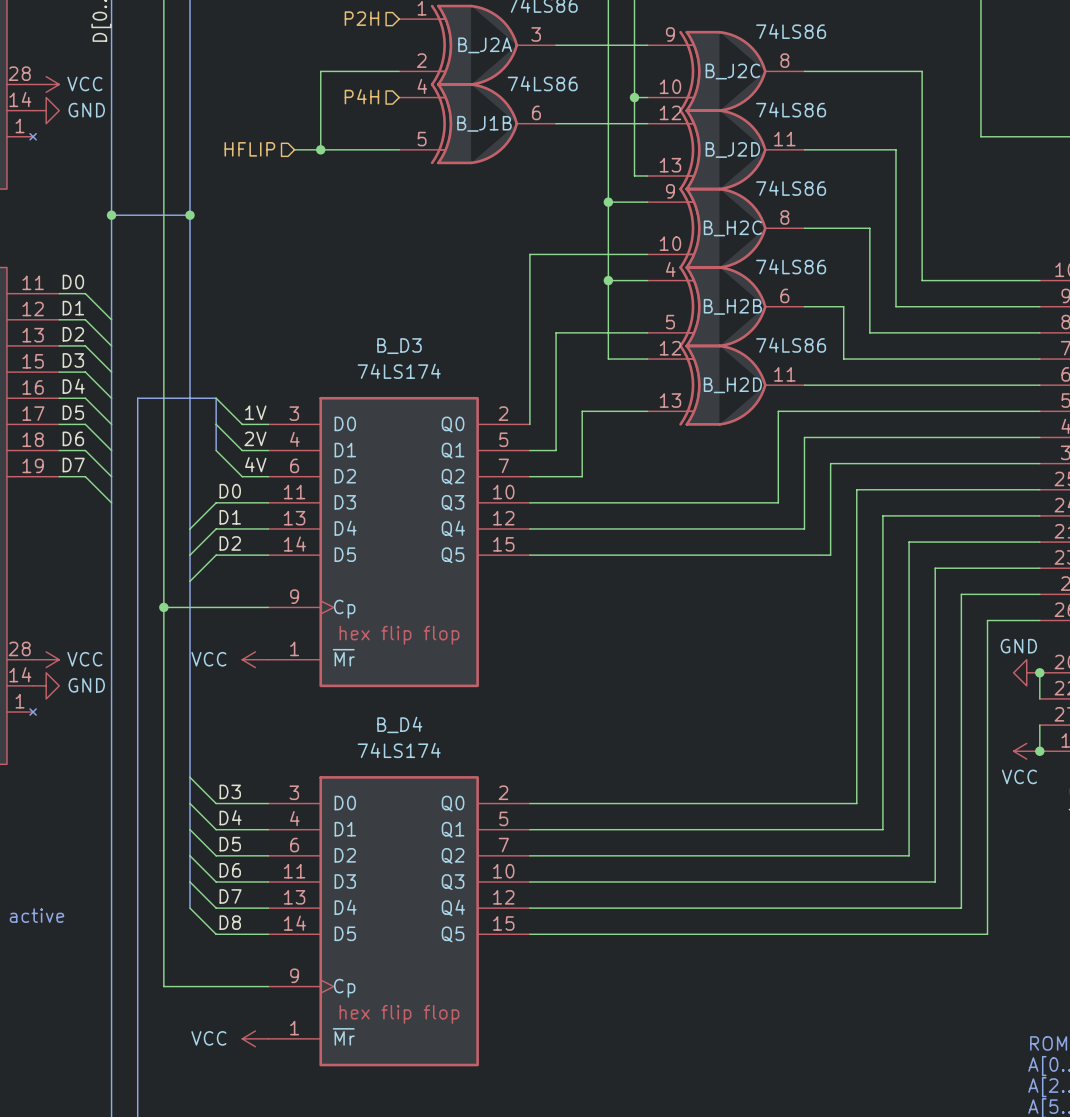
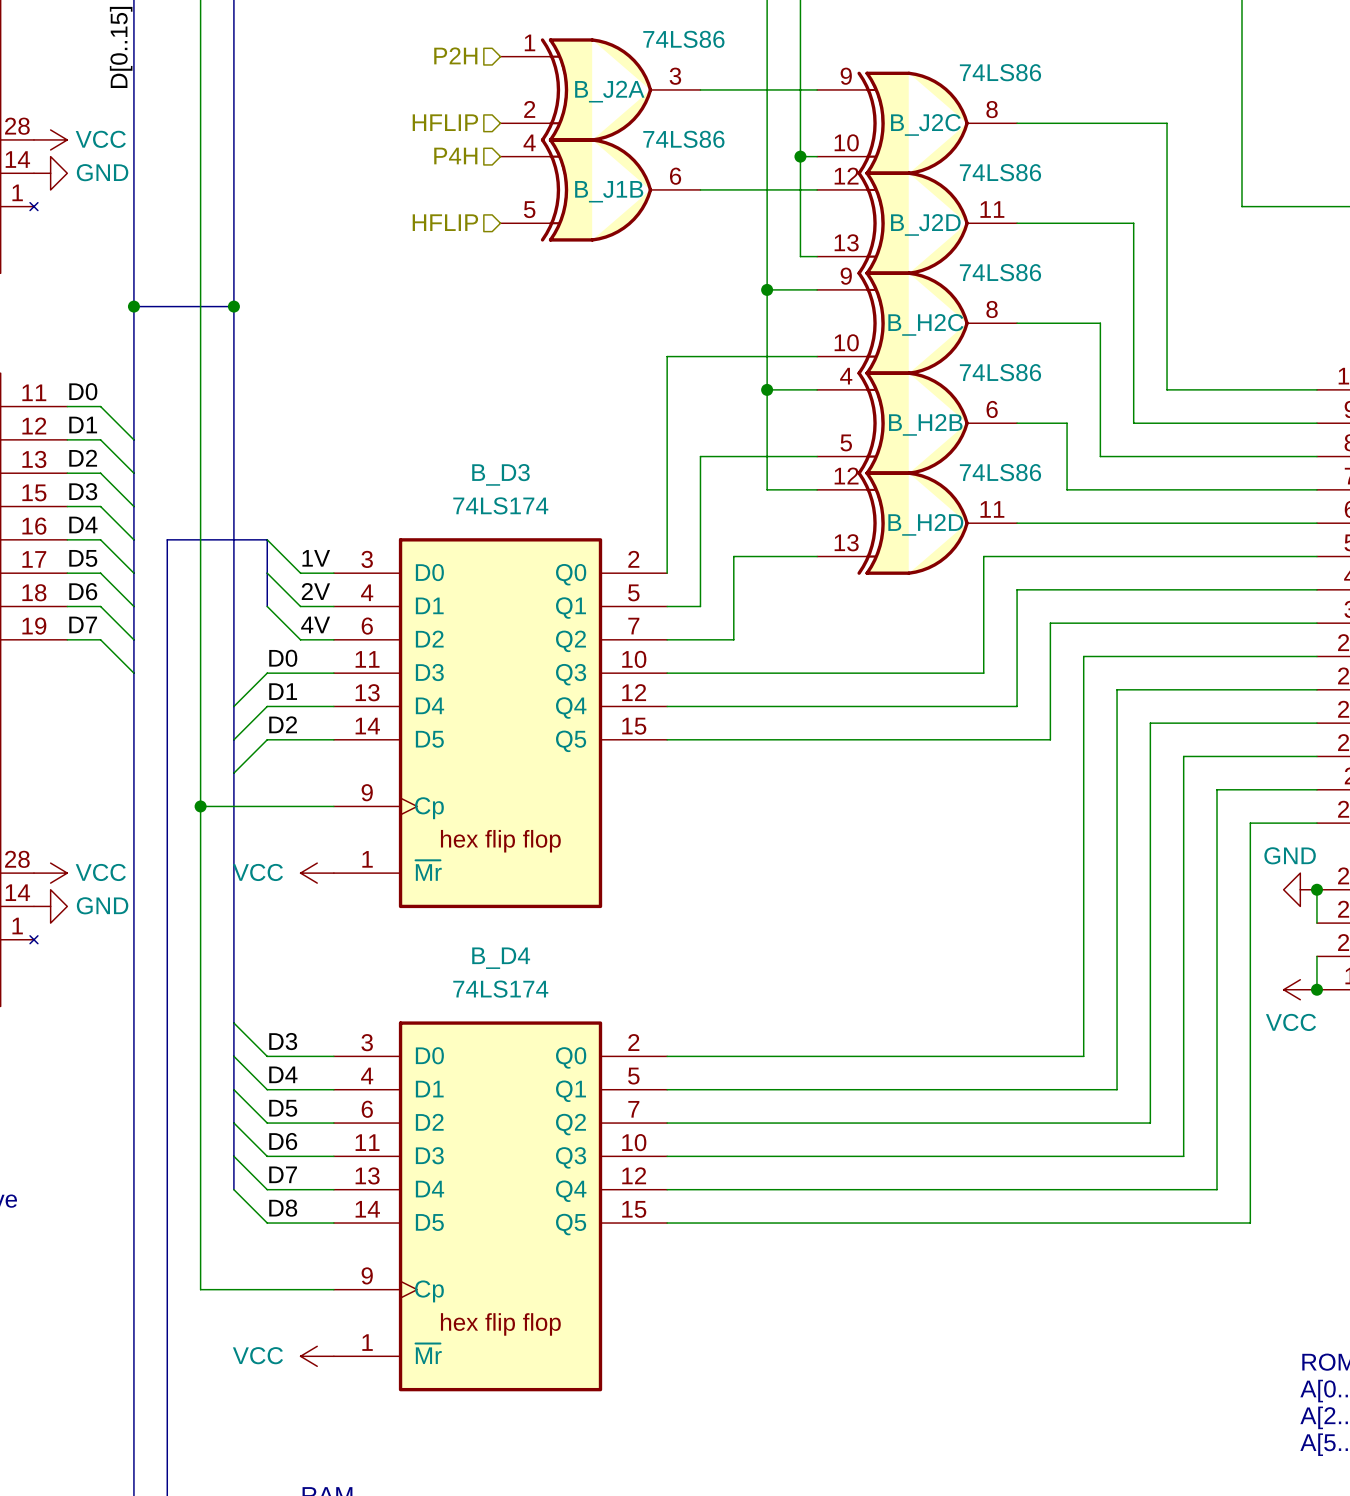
hierarchical label: none -> HFLIP (445, 122)
wire: (399, 71) (320, 71) (320, 149) -> none
hierarchical label: HFLIP (249, 149) -> none
wire: (294, 149) (399, 149) -> none
junction: (320, 149) -> none
hierarchical label: none -> HFLIP (445, 222)

